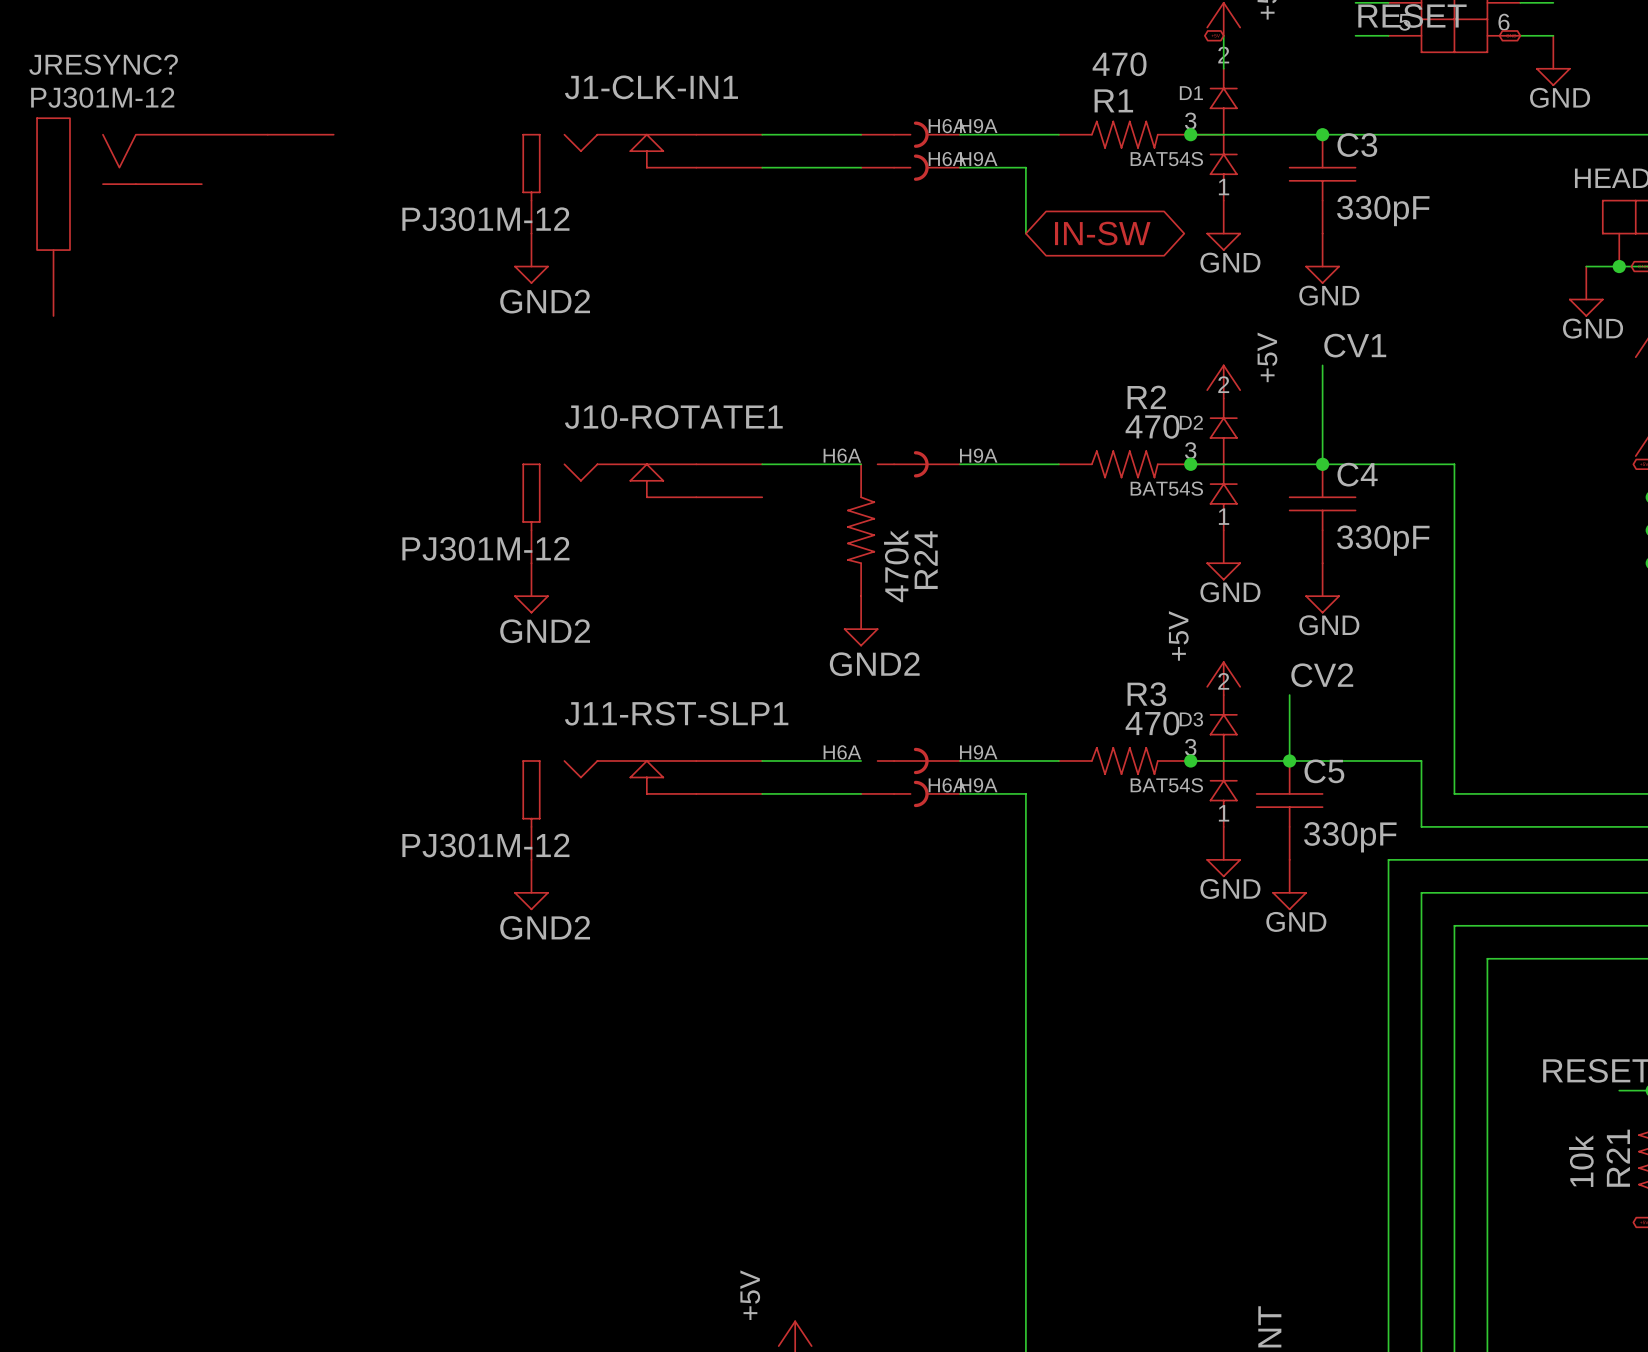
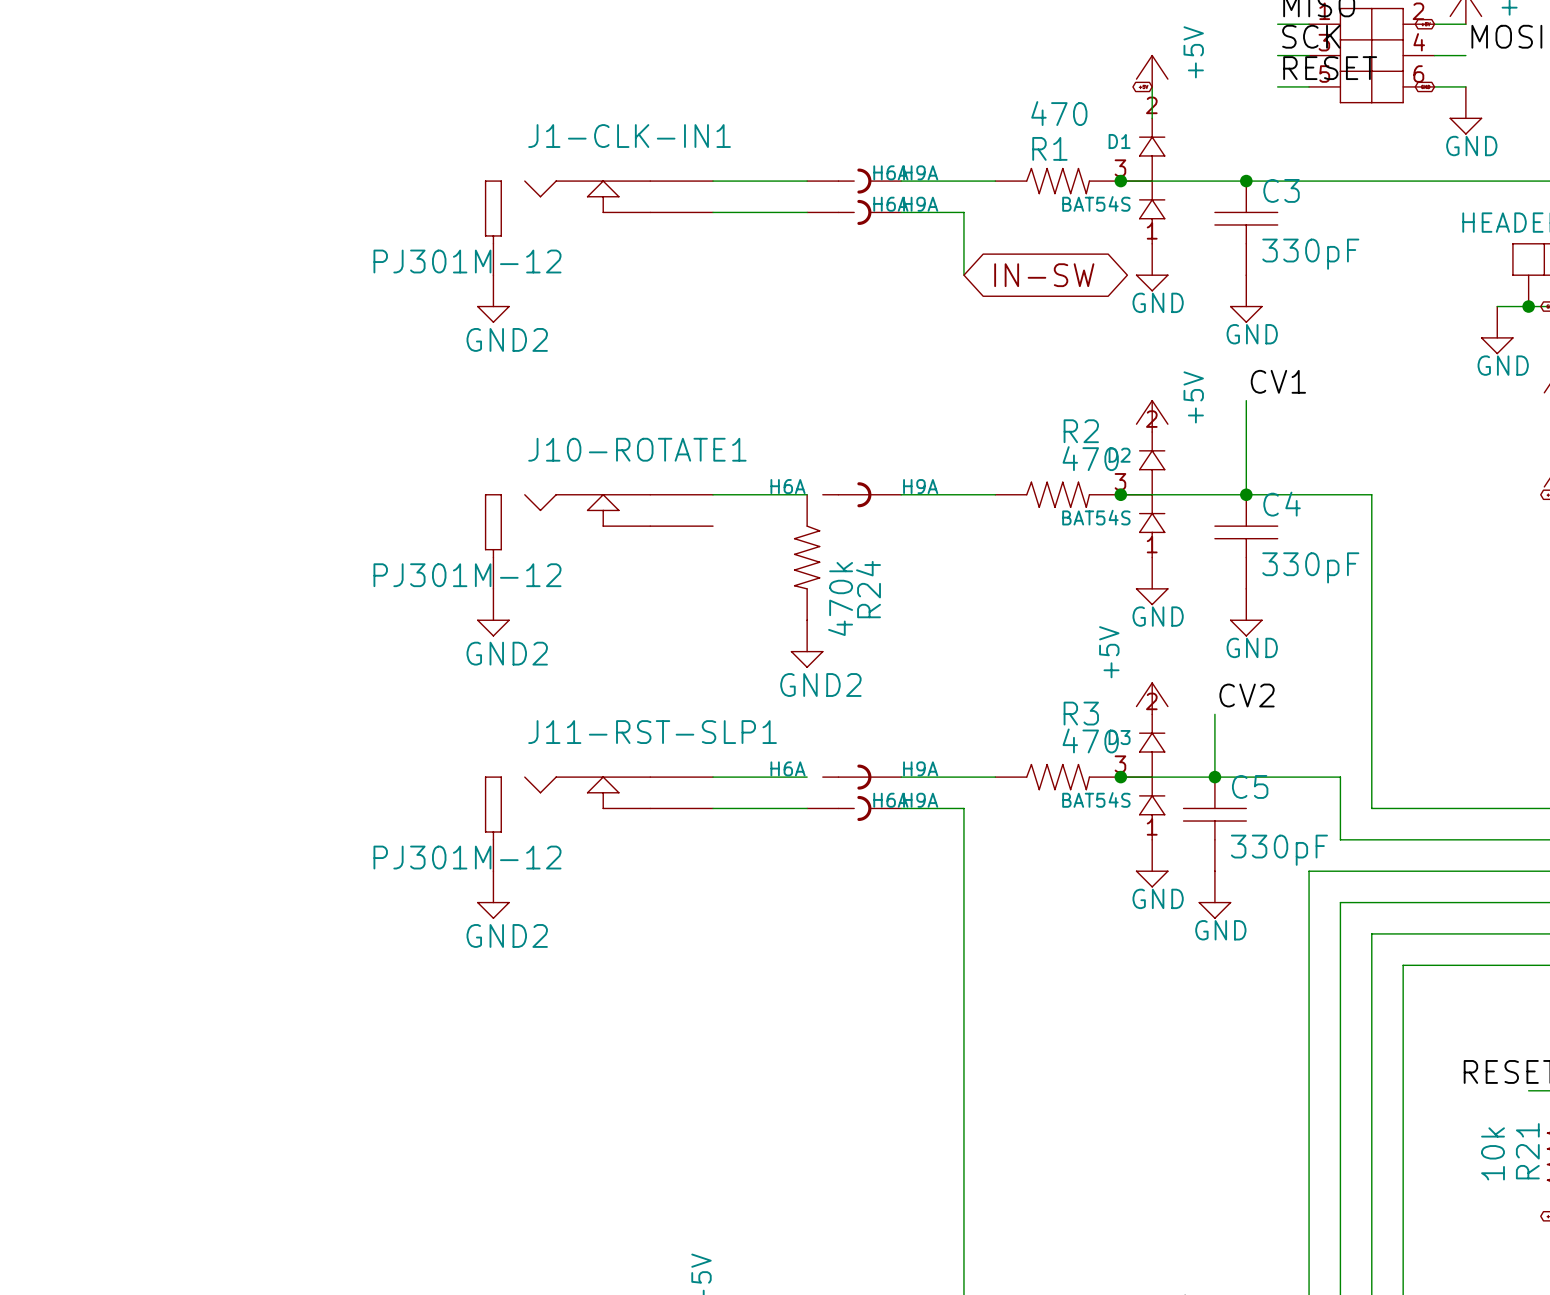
JRESYNC?: PJ301M-12 (185, 217) -> none

